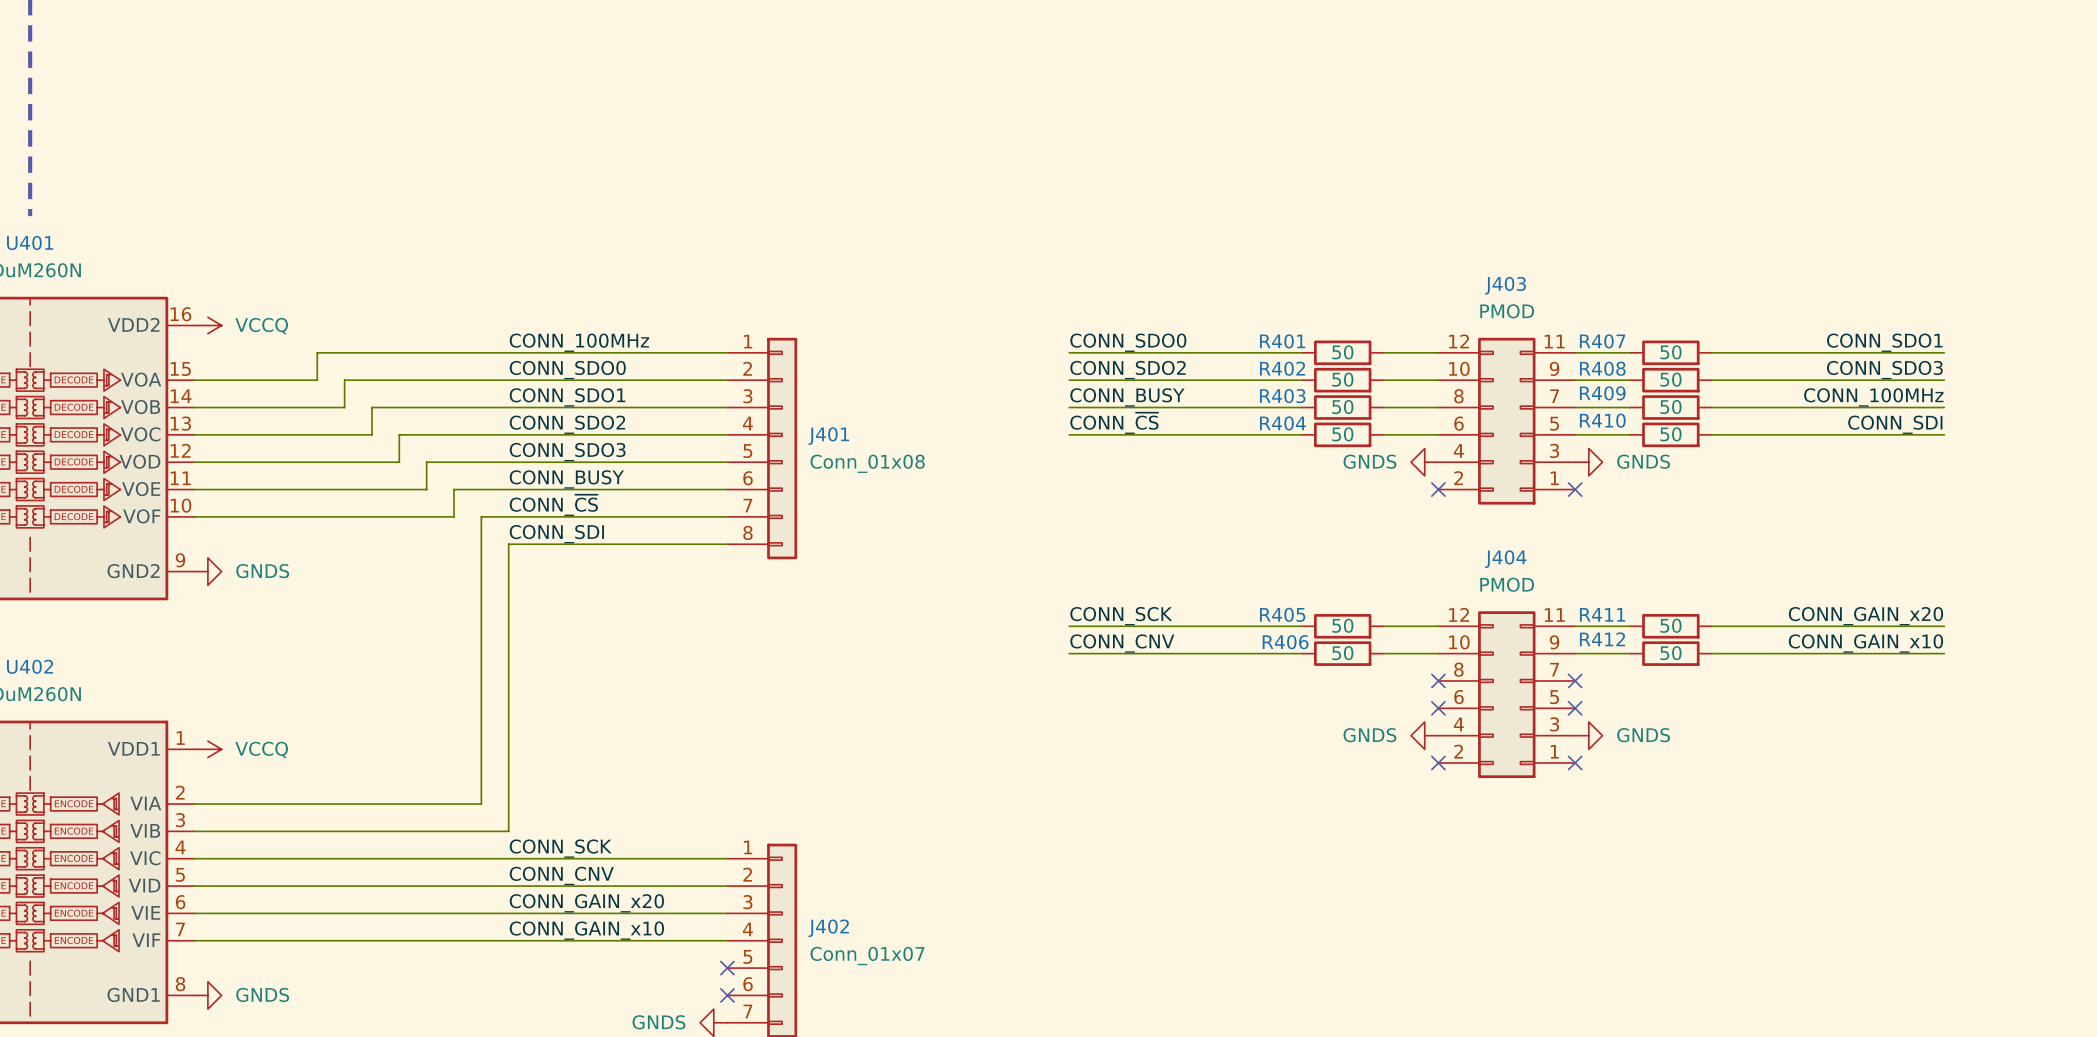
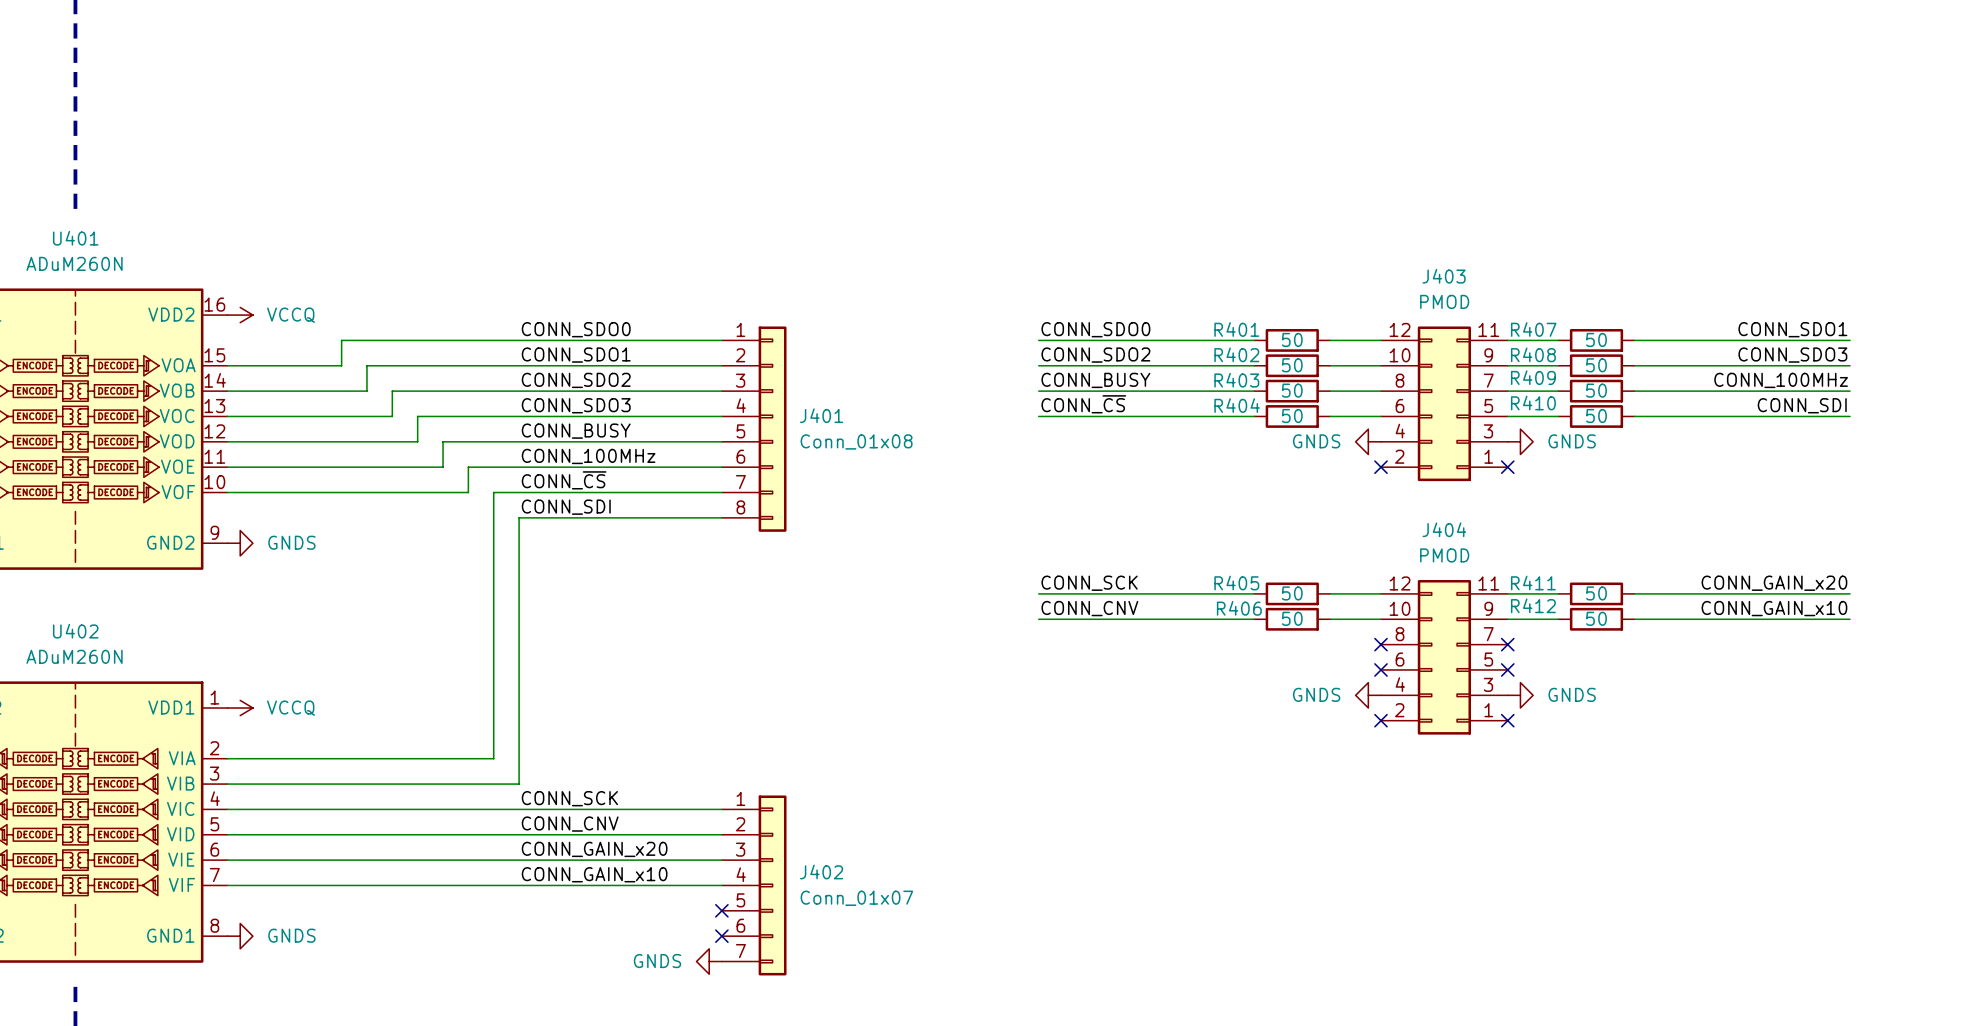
label: CONN_100MHz (579, 342) -> CONN_SDO0 (576, 329)
label: CONN_SDO0 (567, 370) -> CONN_SDO1 (576, 355)
label: CONN_SDO1 (567, 397) -> CONN_SDO2 (576, 380)
label: CONN_SDO2 (567, 424) -> CONN_SDO3 (576, 405)
label: CONN_SDO3 (567, 452) -> CONN_BUSY (576, 431)
label: CONN_BUSY (566, 479) -> CONN_100MHz (588, 456)

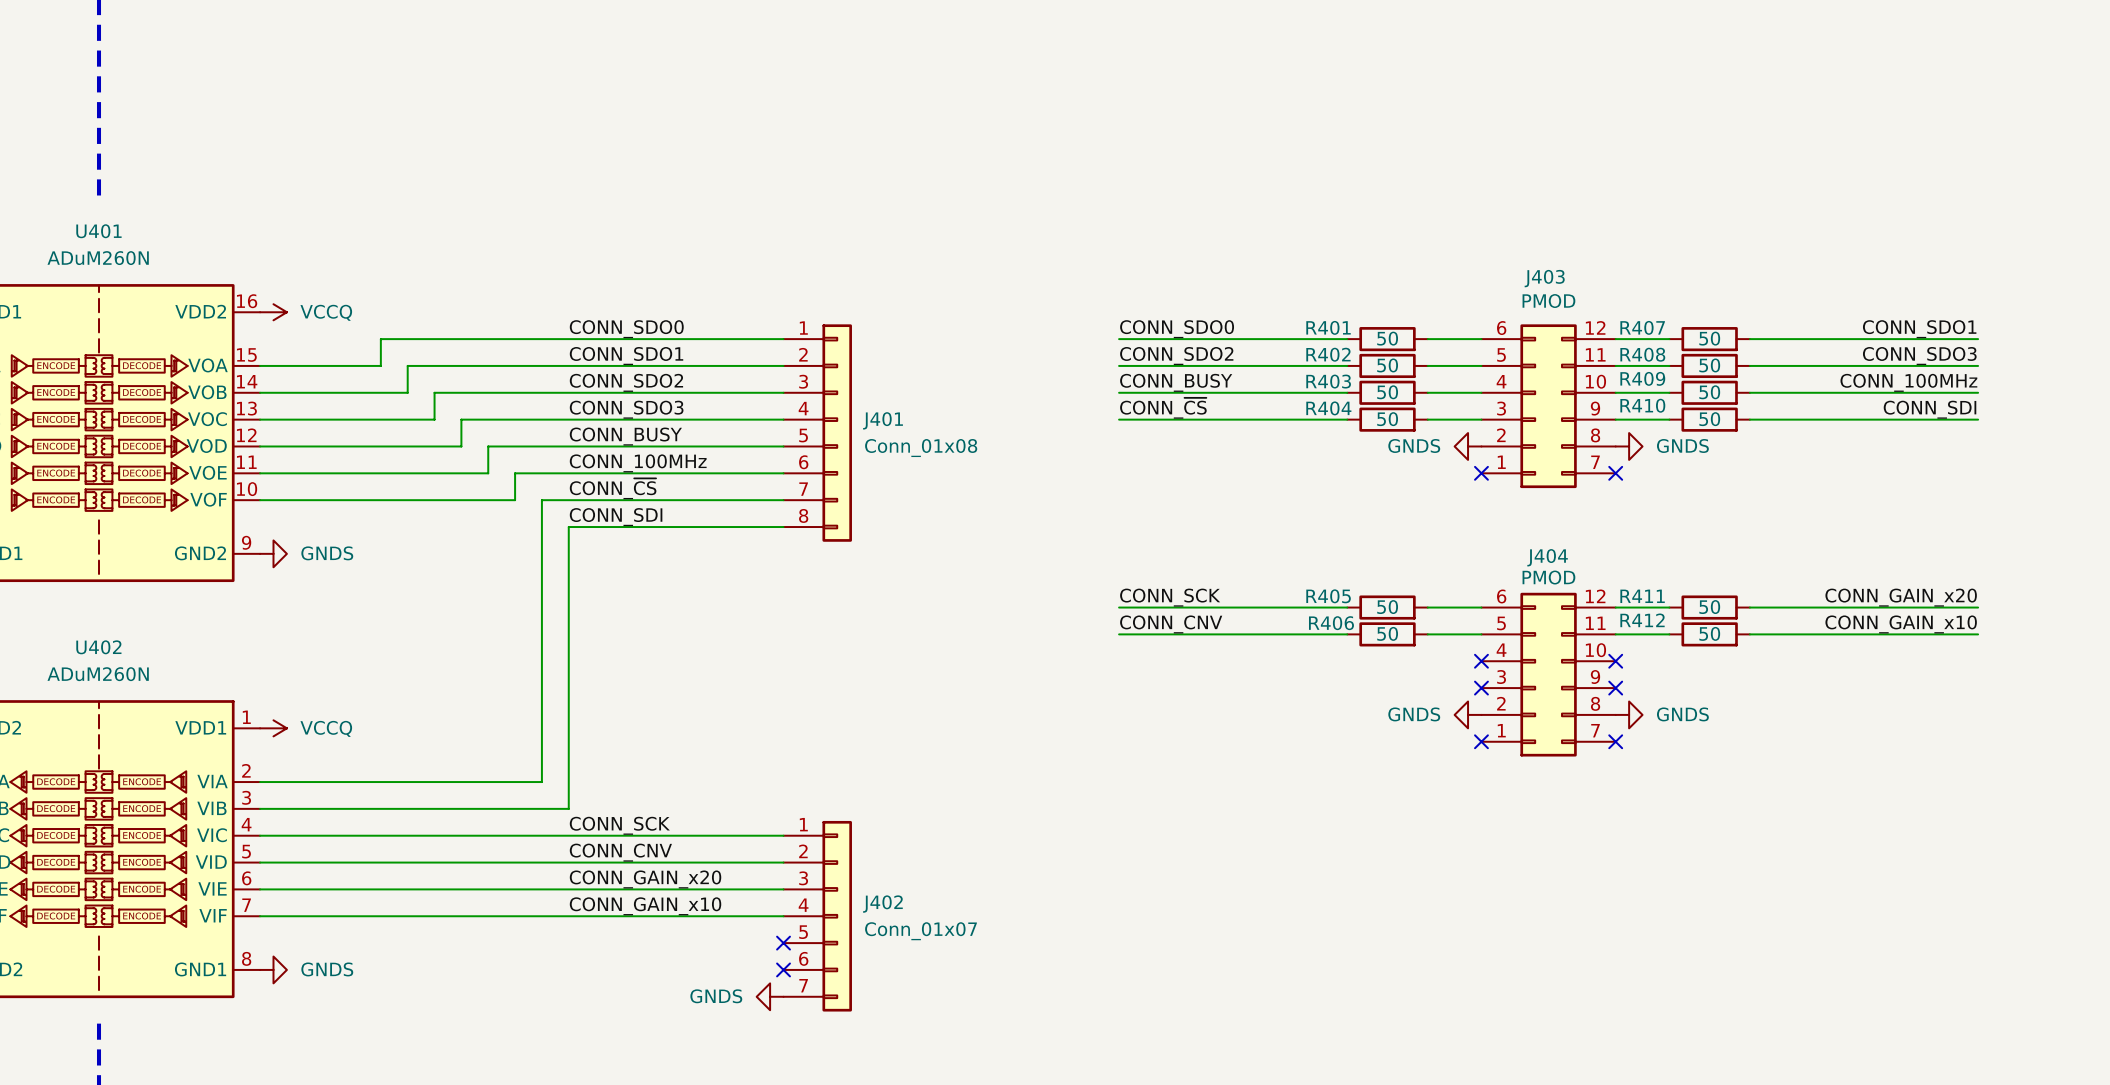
J403 symbol: [1381, 326, 1508, 482] -> [1481, 324, 1616, 489]
J404 symbol: [1381, 579, 1508, 735] -> [1481, 592, 1616, 757]

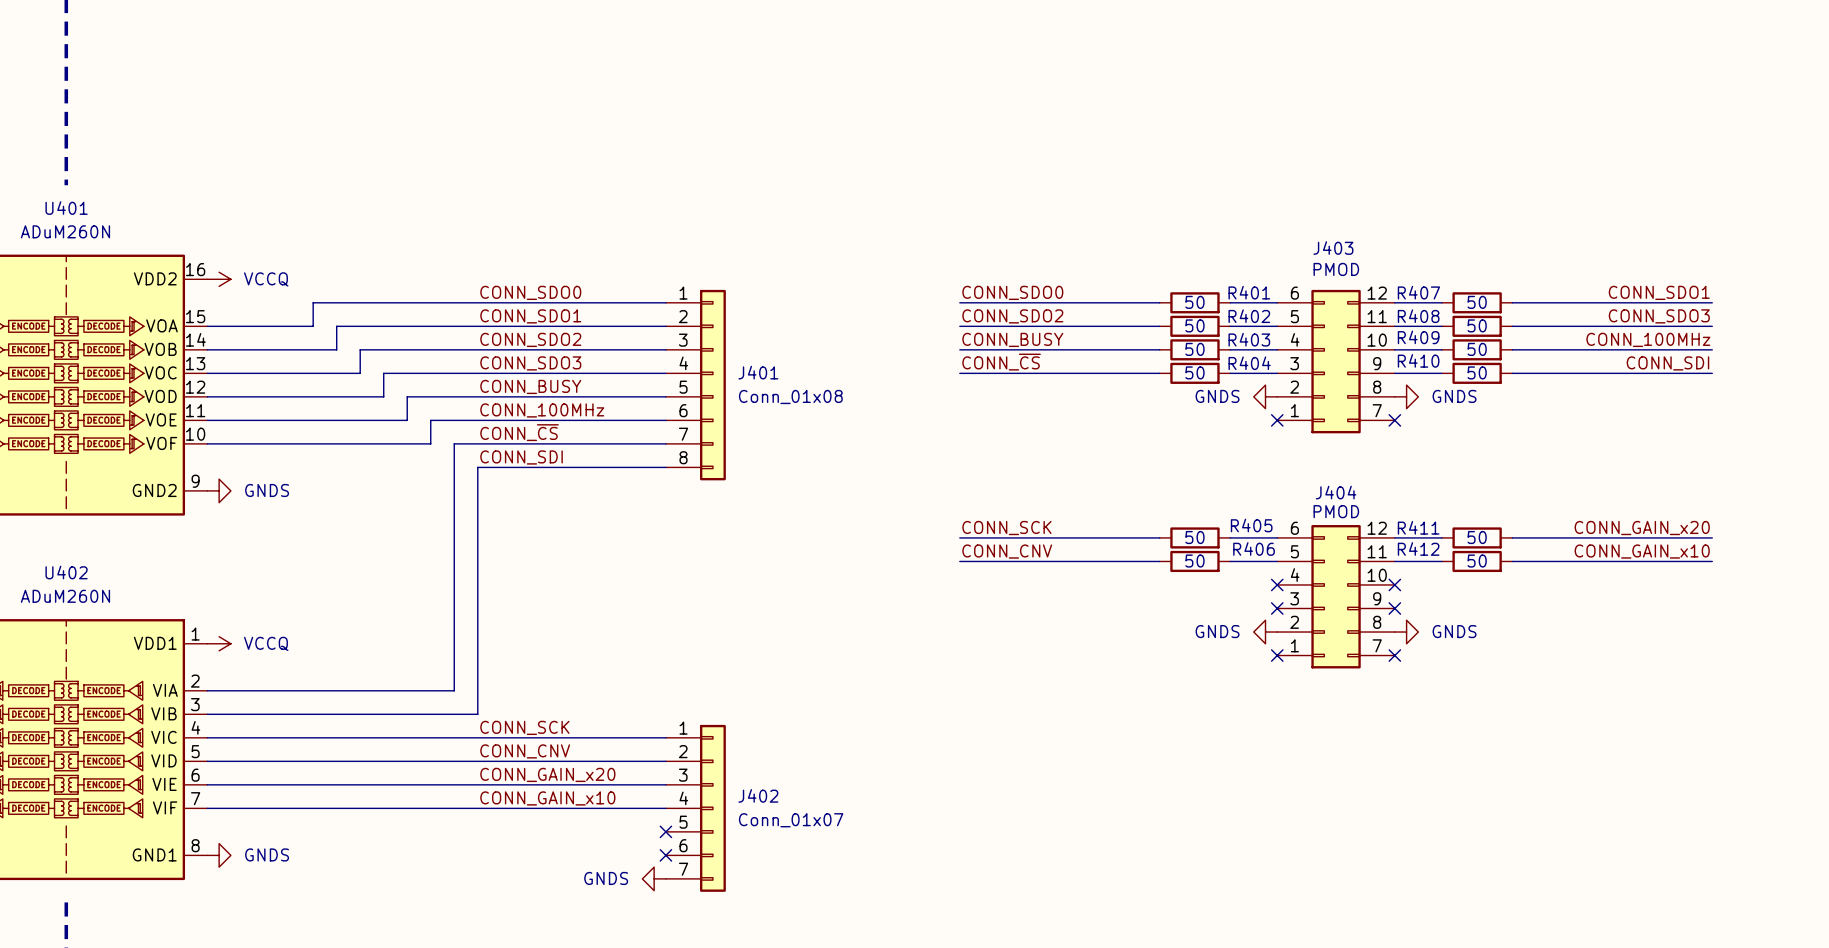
R401 name position: R401 (1328, 327) -> R401 (1249, 292)
R402 name position: R402 (1328, 354) -> R402 (1249, 316)
R403 name position: R403 (1328, 381) -> R403 (1249, 339)
R404 name position: R404 (1328, 408) -> R404 (1249, 363)
R405 name position: R405 (1328, 596) -> R405 (1251, 525)
R406 name position: R406 (1331, 623) -> R406 (1254, 548)

